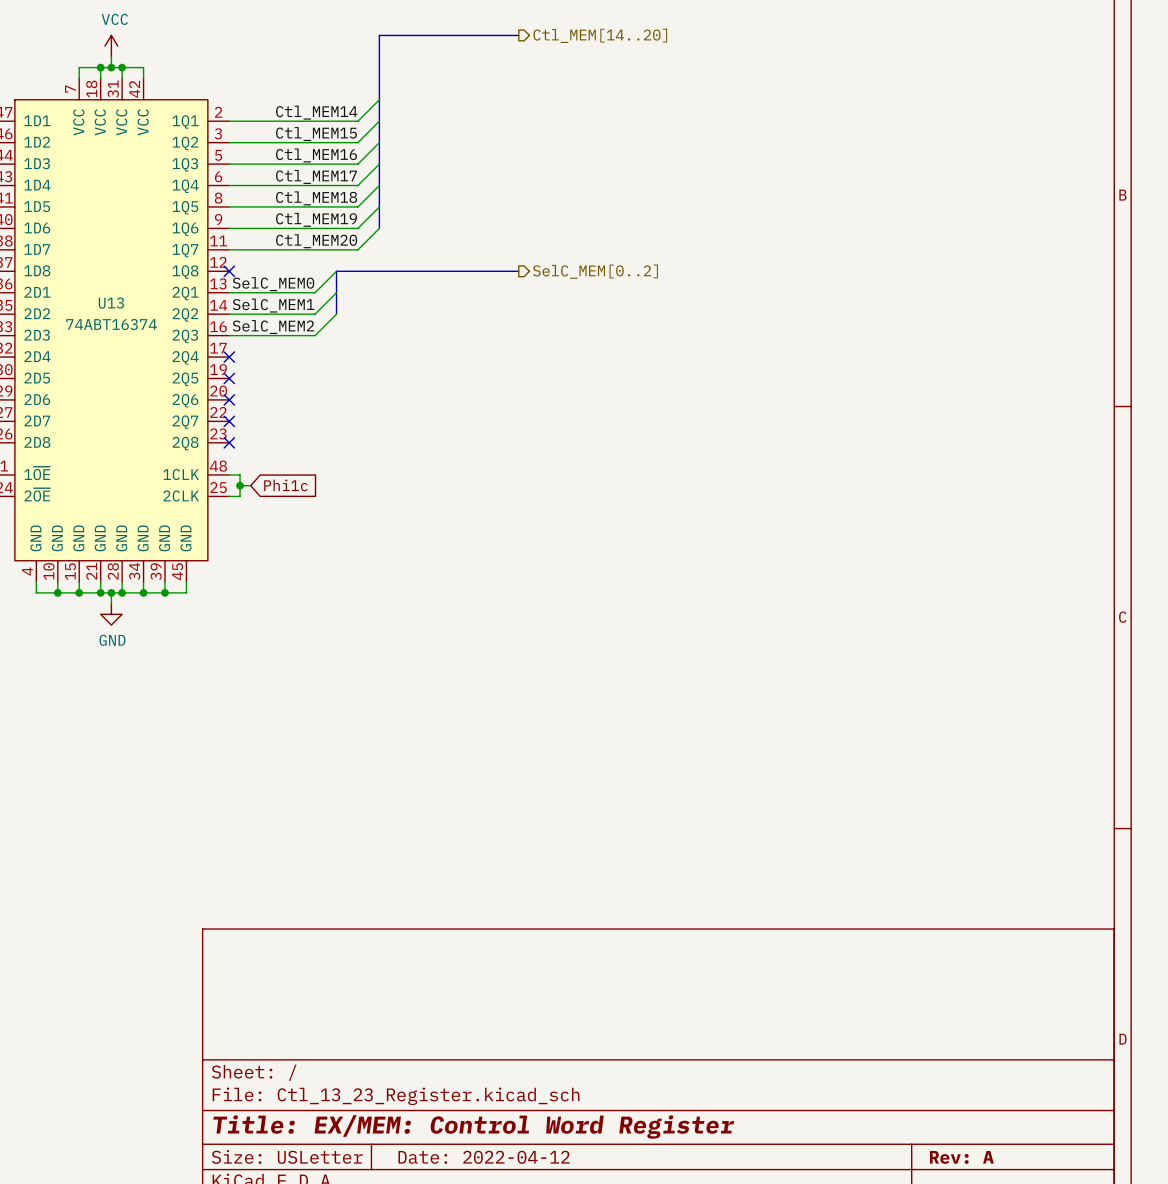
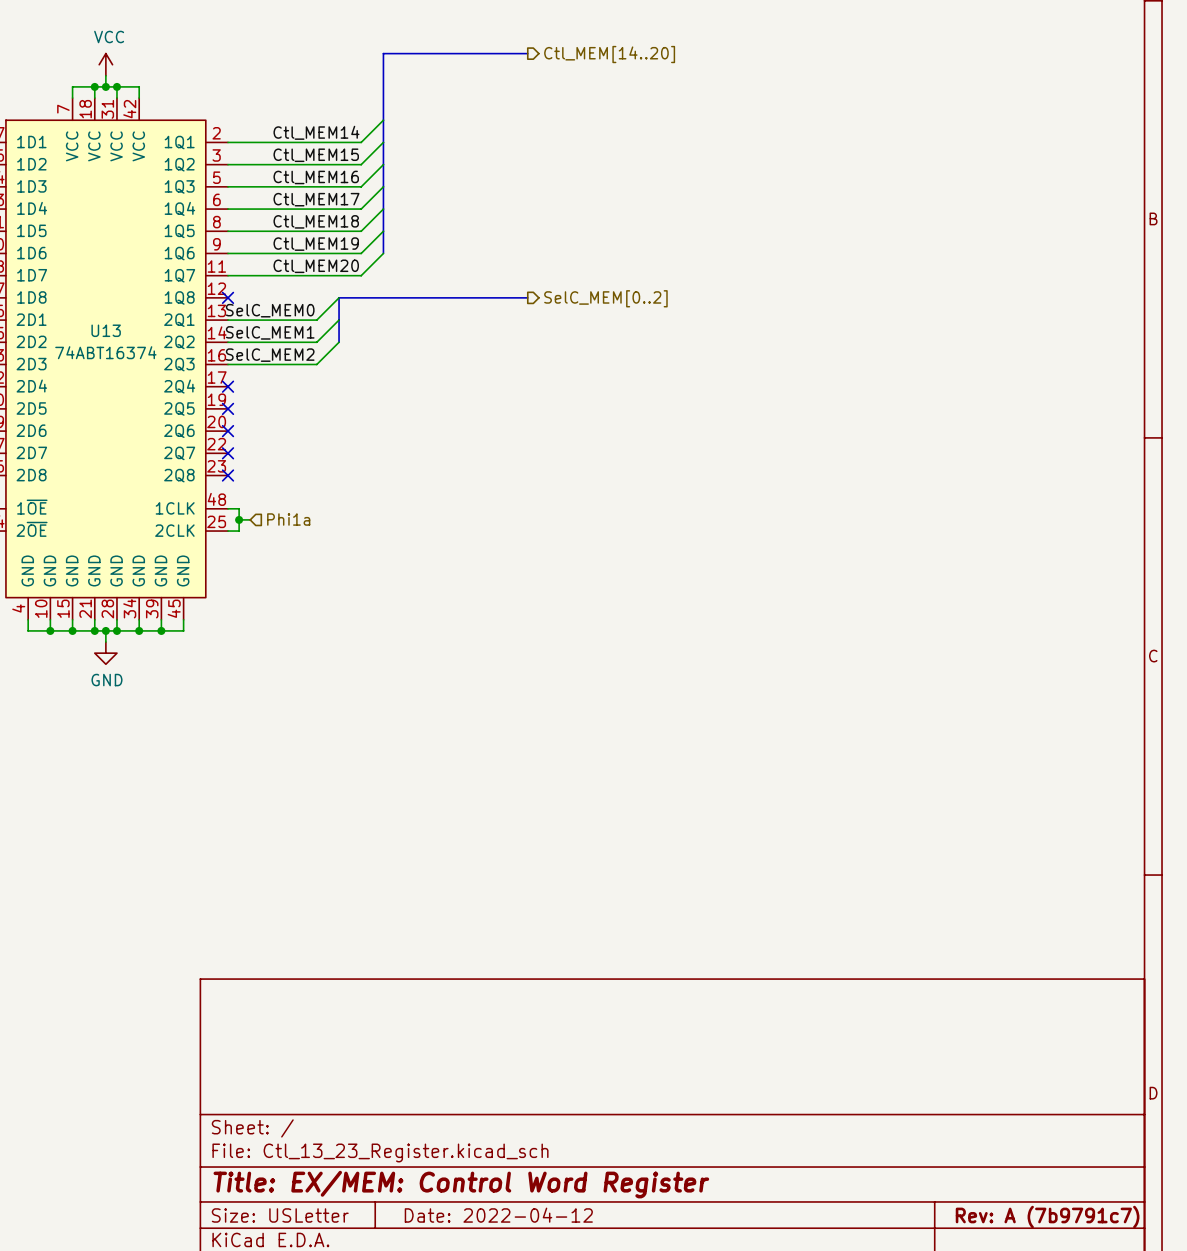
global label: Phi1c (285, 485) -> none
hierarchical label: none -> Phi1a (288, 519)
title block: Rev: A (961, 1157) -> Rev: A (7b9791c7) (1047, 1217)

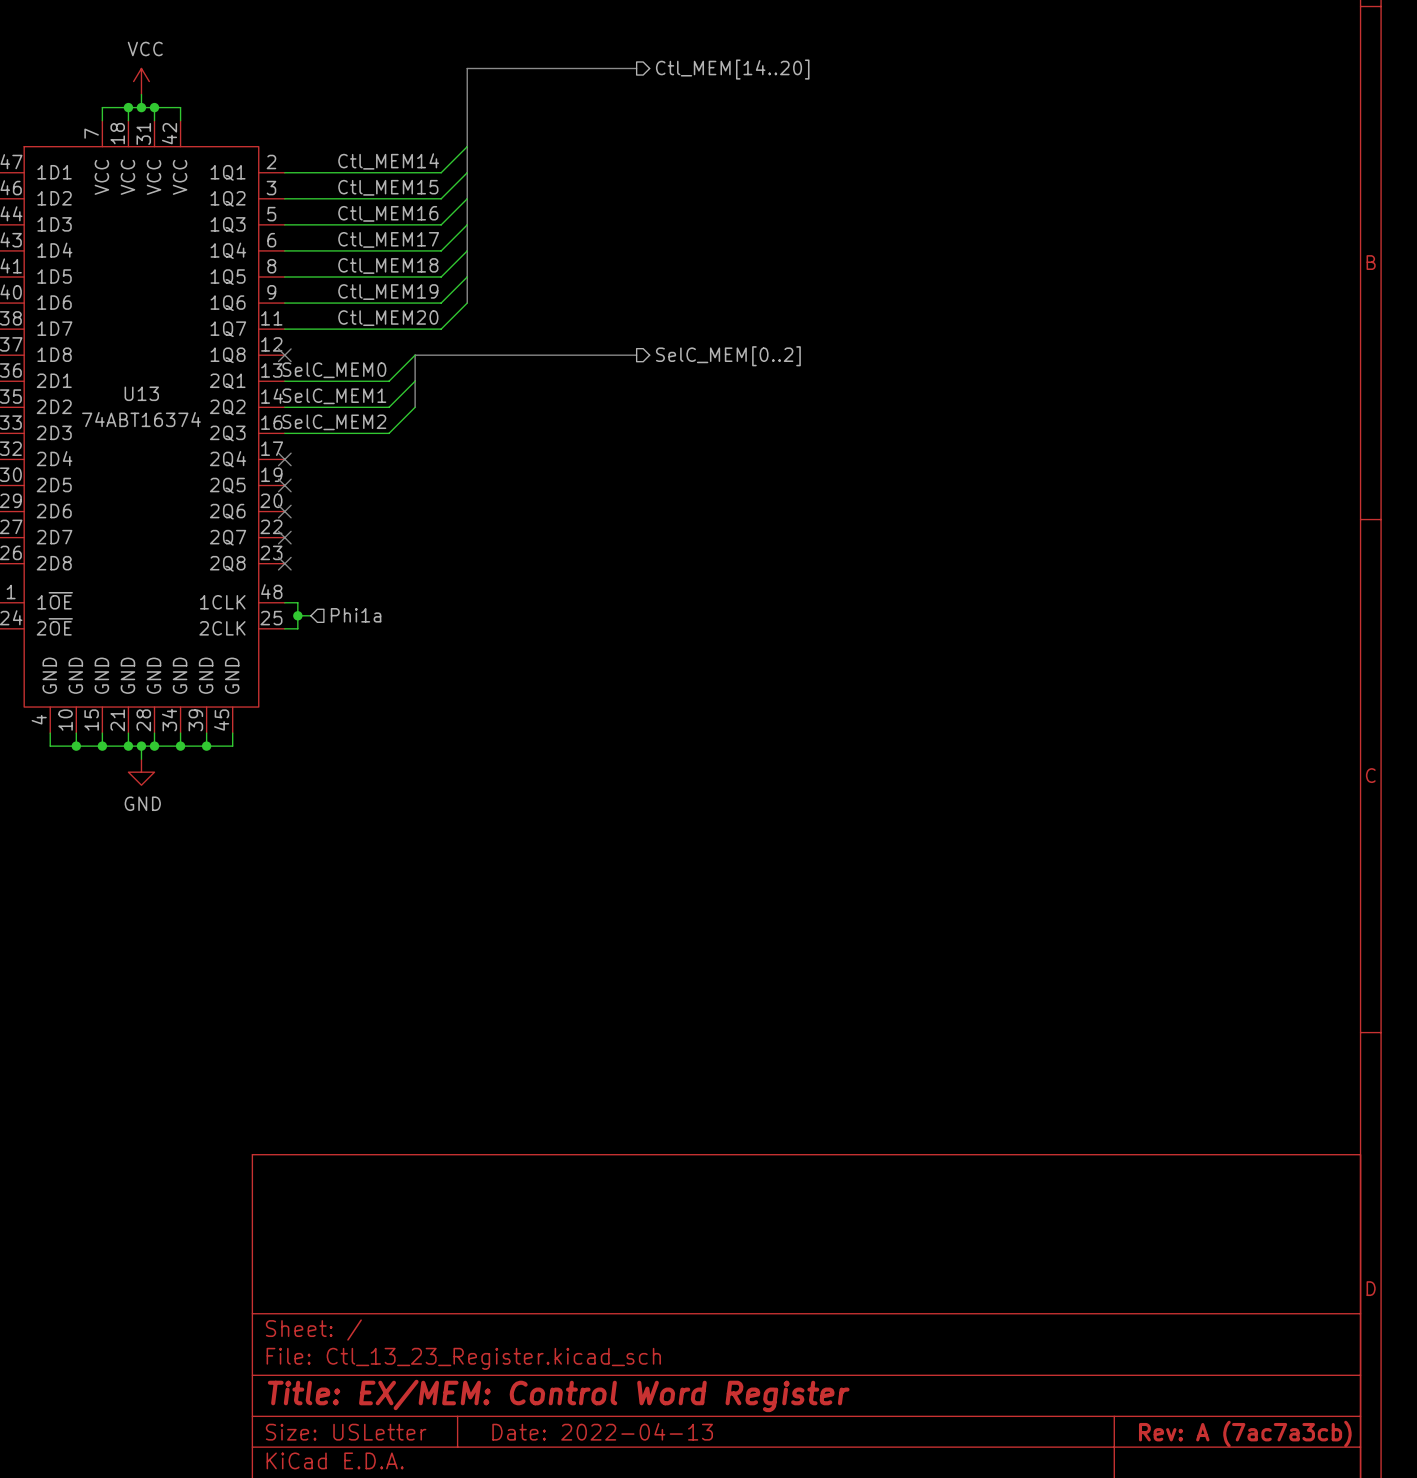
title block: Date: 2022-04-12 (498, 1215) -> Date: 2022-04-13 (602, 1431)
title block: Rev: A (7b9791c7) (1047, 1217) -> Rev: A (7ac7a3cb) (1245, 1434)

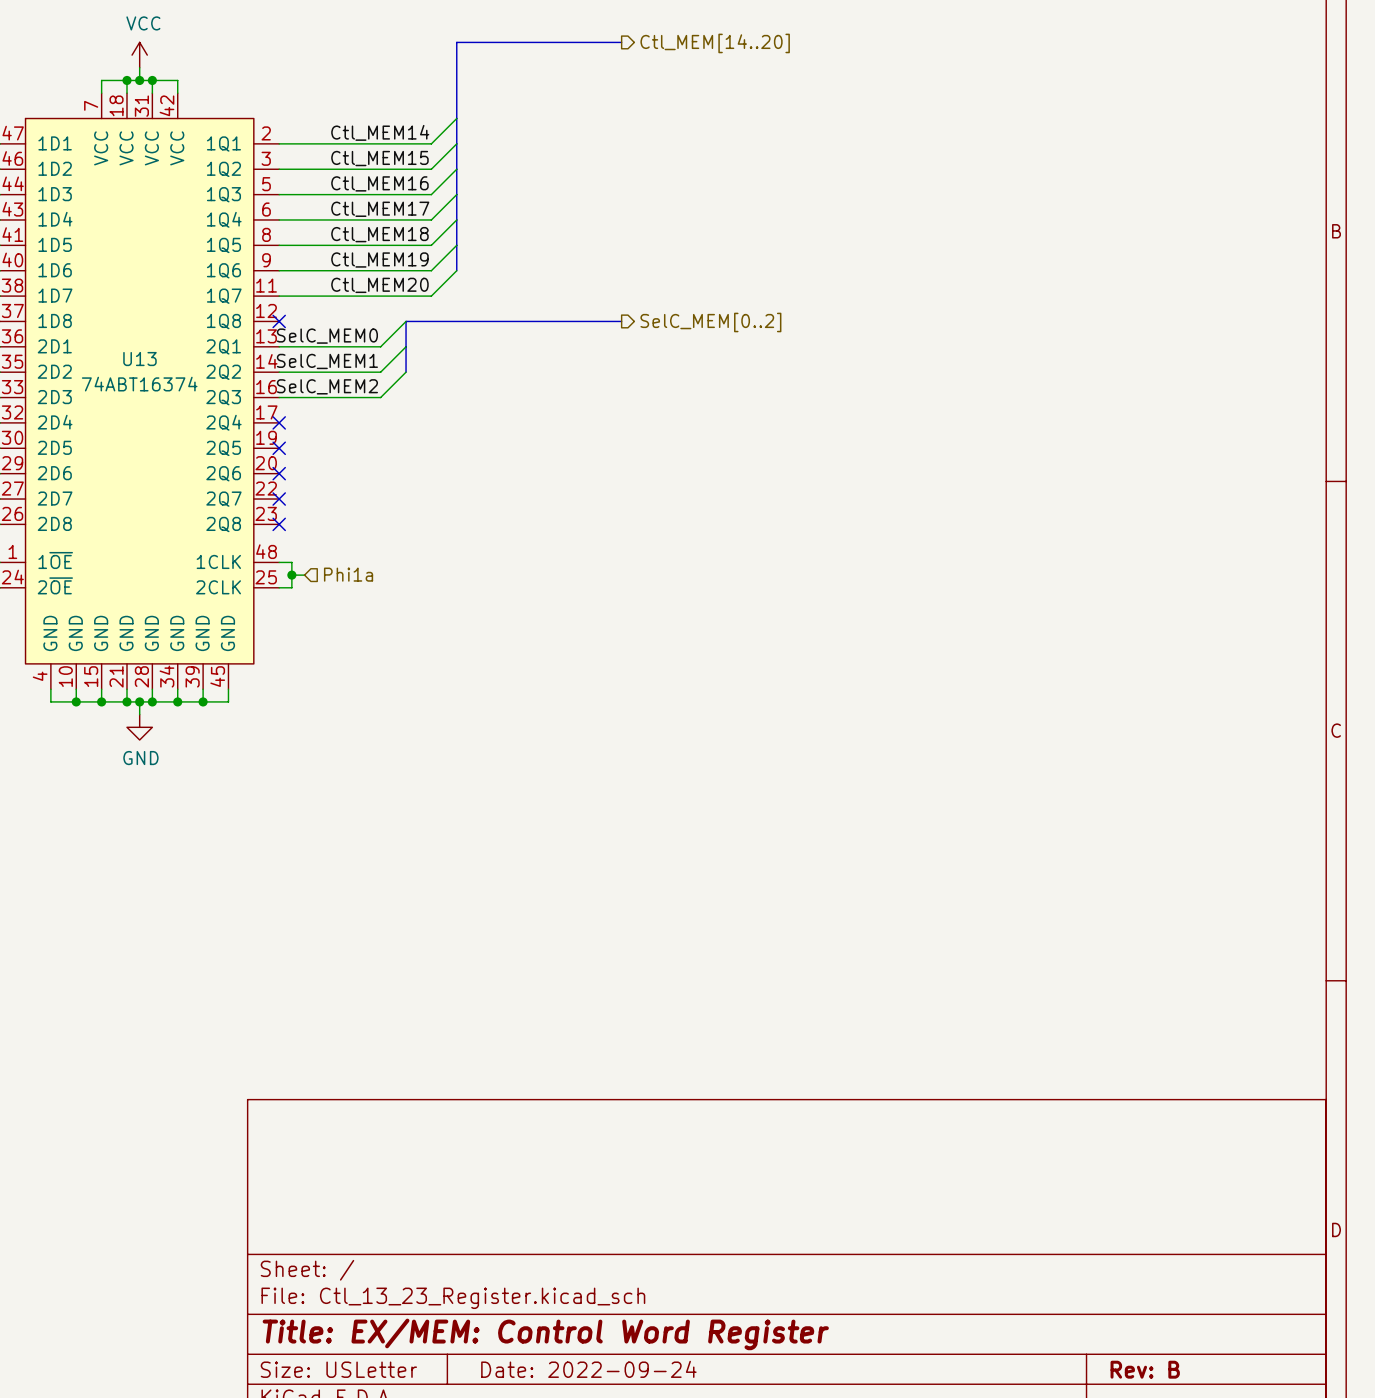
title block: Date: 2022-04-13 (602, 1431) -> Date: 2022-09-24 (588, 1369)
title block: Rev: A (7ac7a3cb) (1245, 1434) -> Rev: B (1145, 1369)

